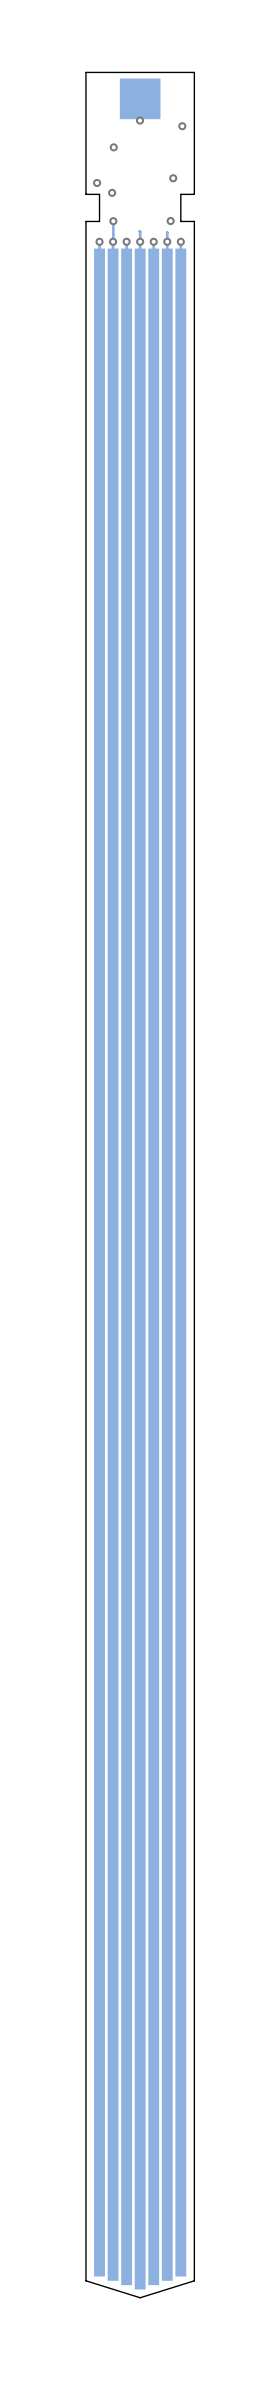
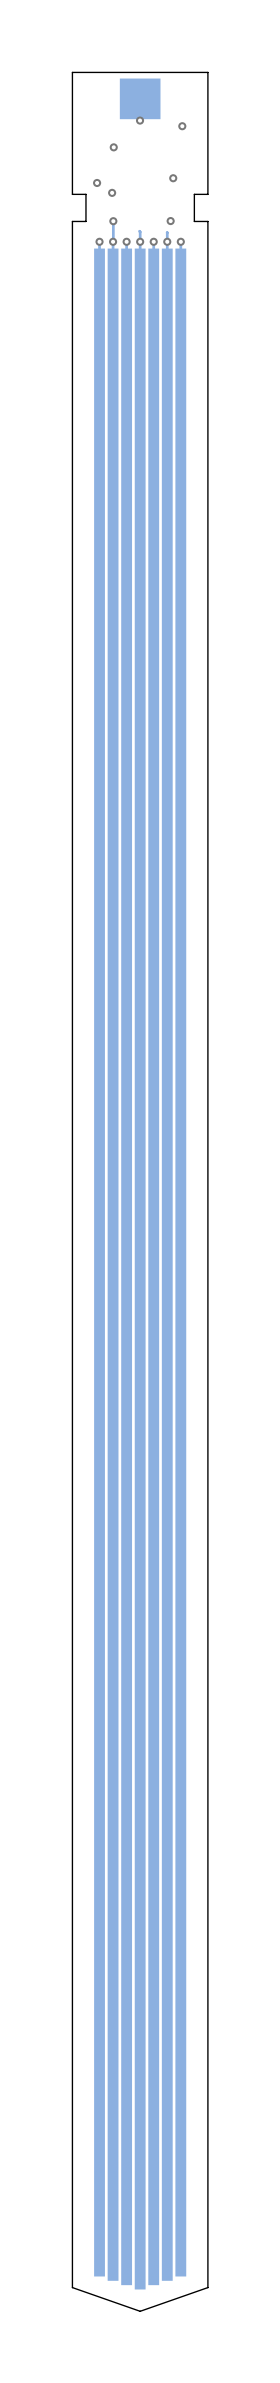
board edge: (194, 72) (194, 194) (180, 194) (180, 221) (194, 221) (194, 2280) (140, 2297) (85, 2280) (85, 221) (99, 221) (99, 194) (85, 194) (85, 72) -> (194, 72) (207, 72) (207, 194) (194, 194) (194, 221) (207, 221) (207, 2287) (140, 2311) (72, 2287) (72, 221) (85, 221) (85, 194) (72, 194) (72, 72) (85, 72)

